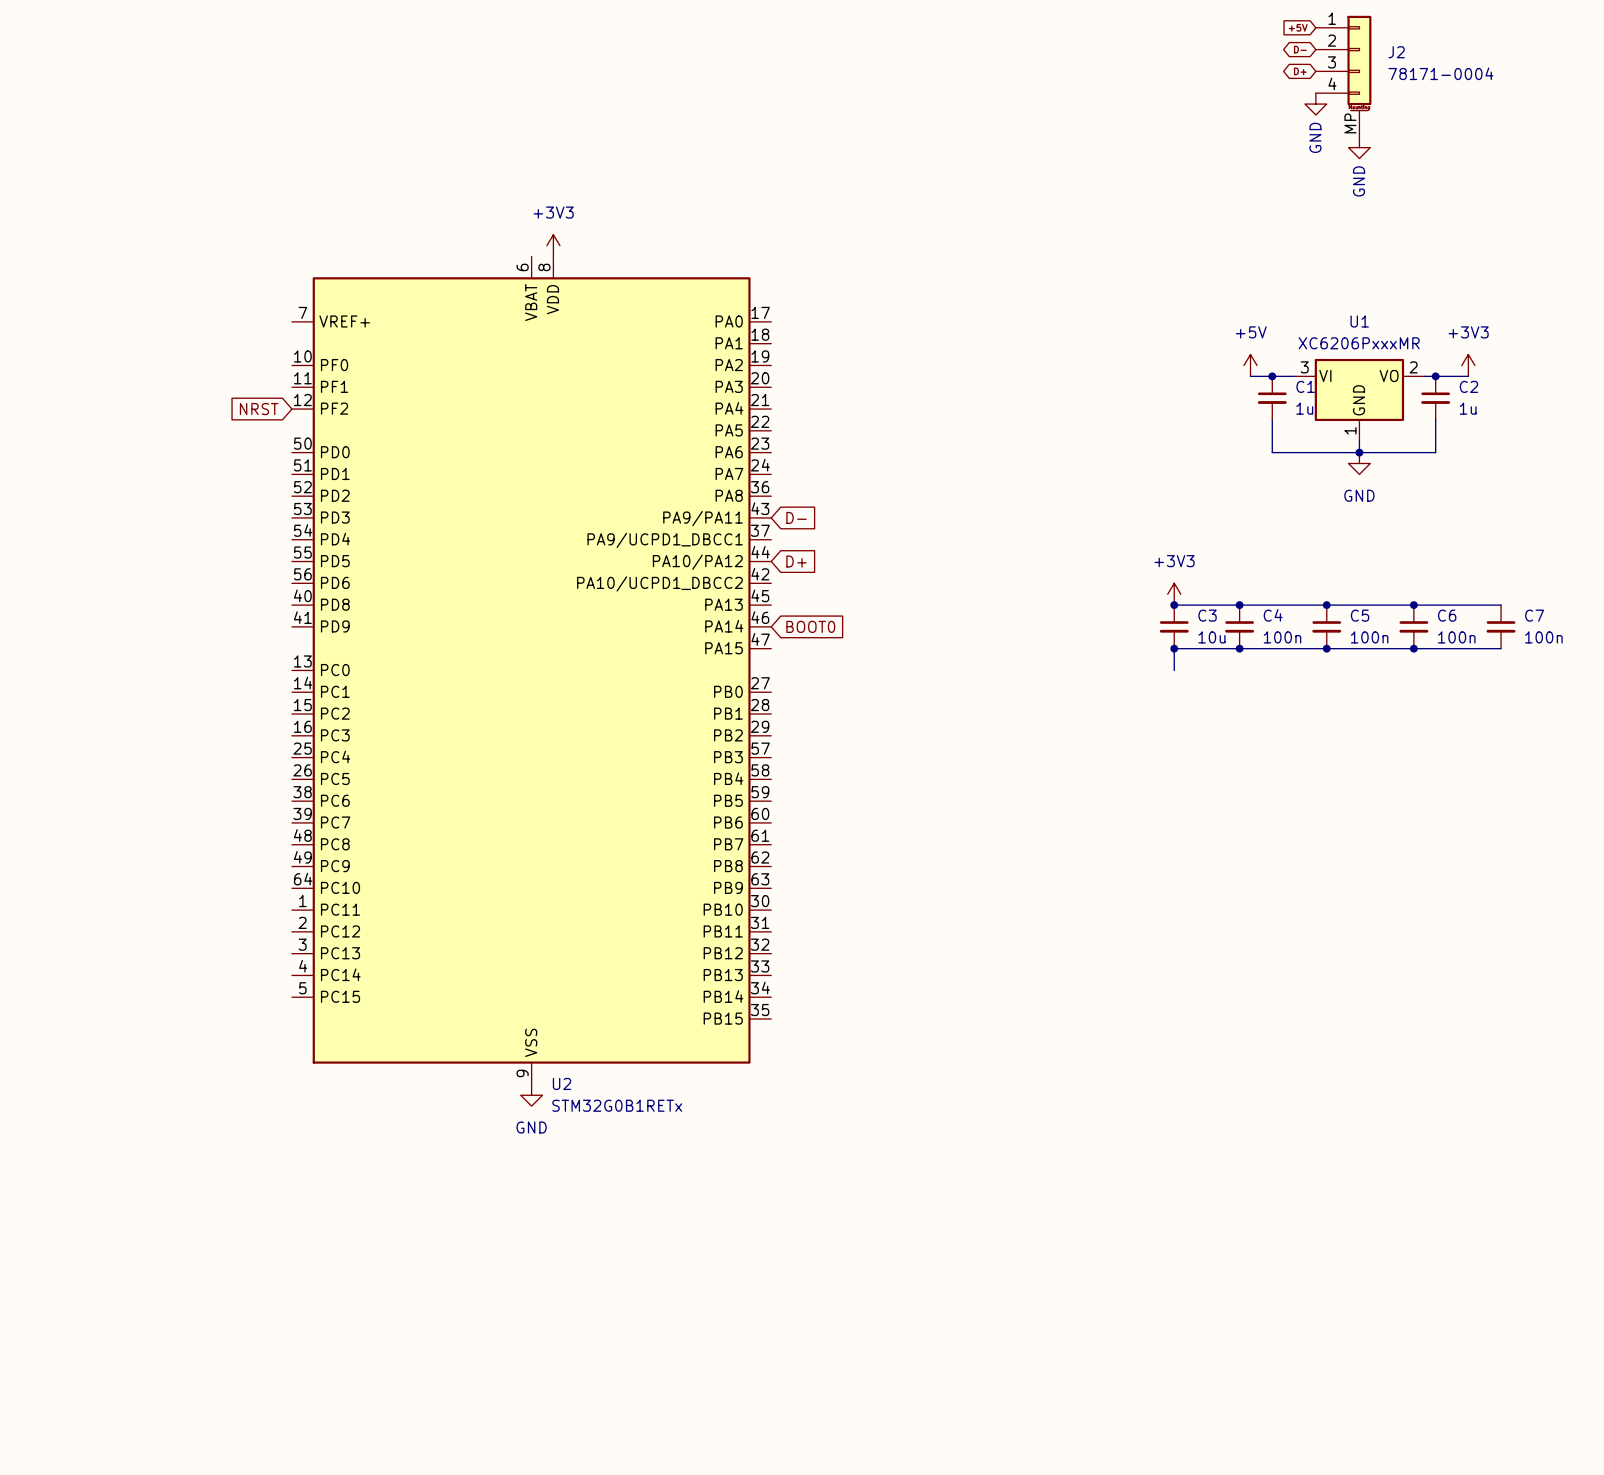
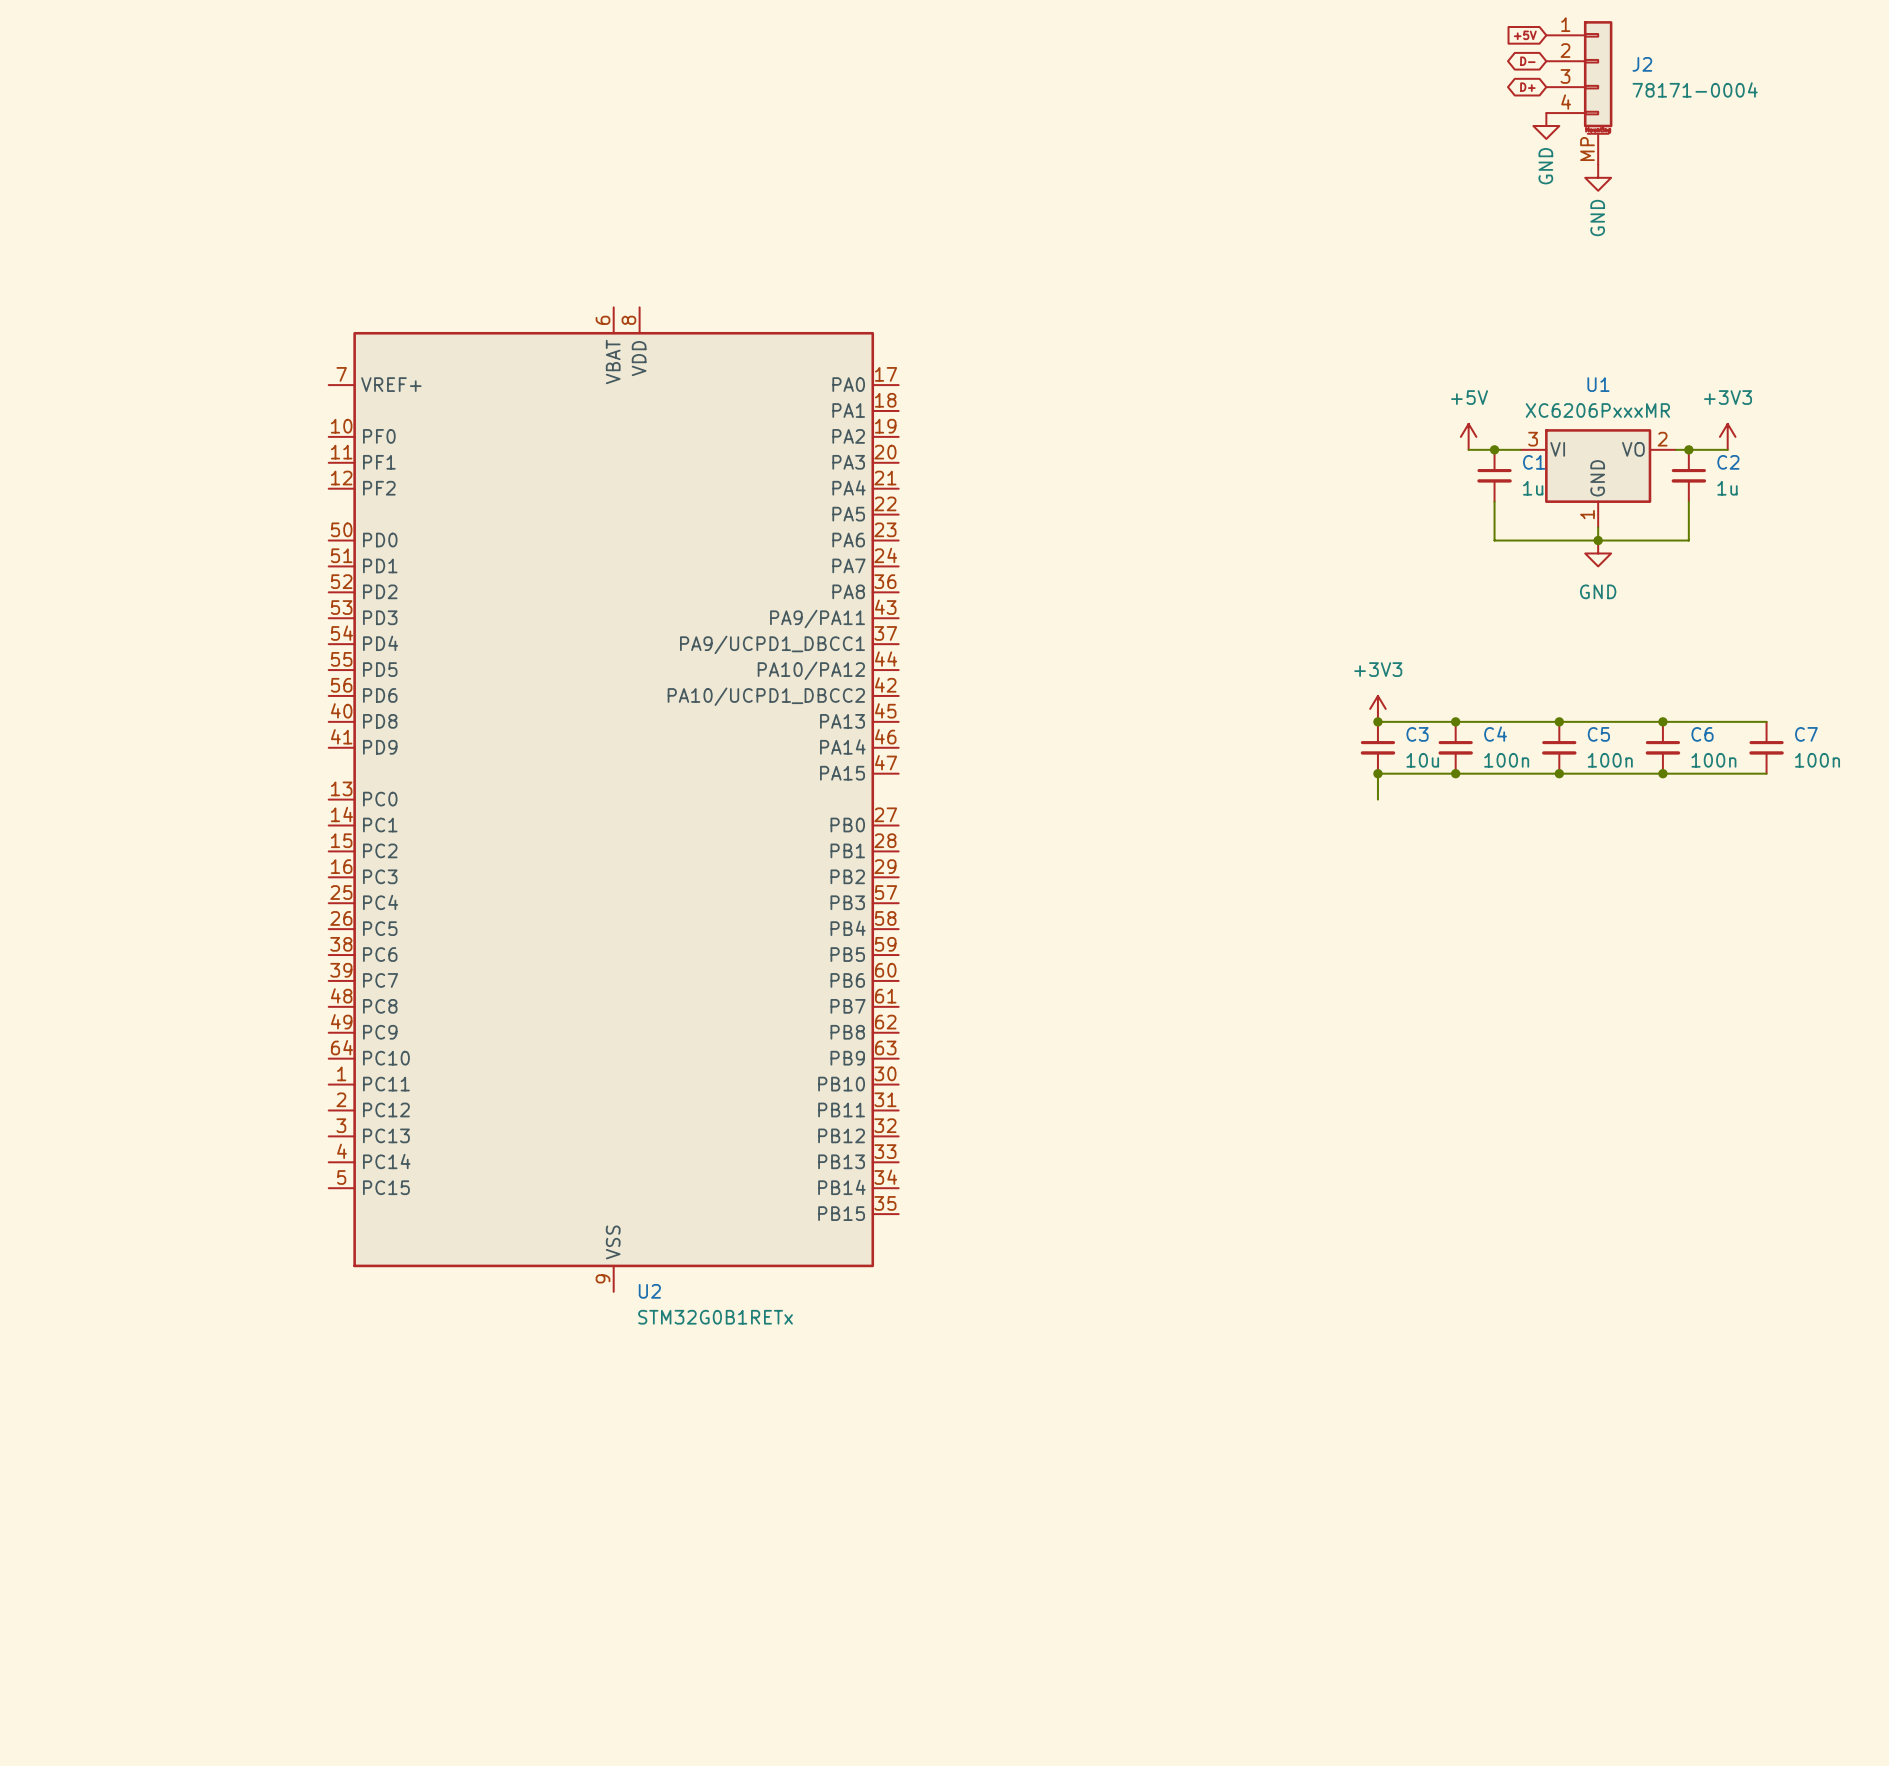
power symbol: +3V3 (553, 245) -> none
global label: NRST (259, 409) -> none
global label: D- (796, 517) -> none
global label: D+ (796, 561) -> none
global label: BOOT0 (810, 626) -> none
power symbol: GND (531, 1095) -> none

